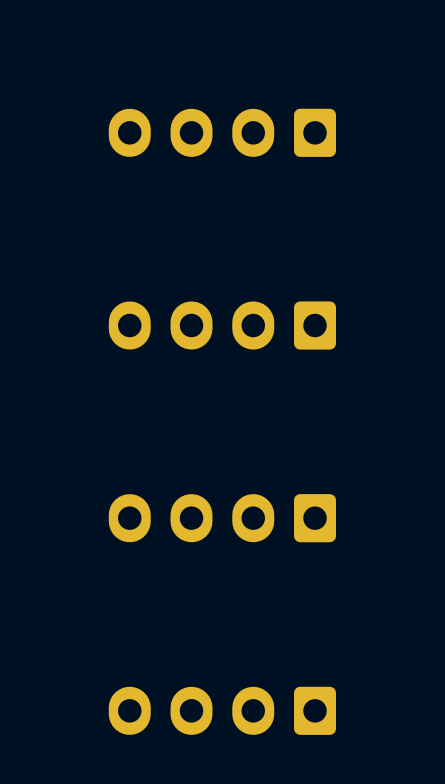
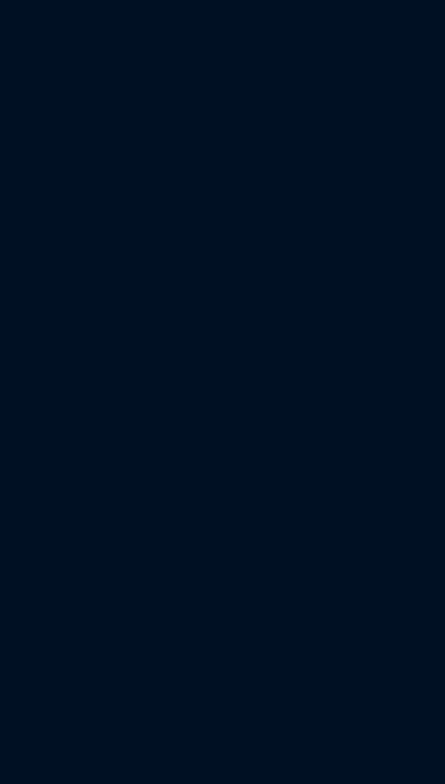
part: (222, 132) -> none
part: (222, 325) -> none
part: (222, 518) -> none
part: (222, 710) -> none

